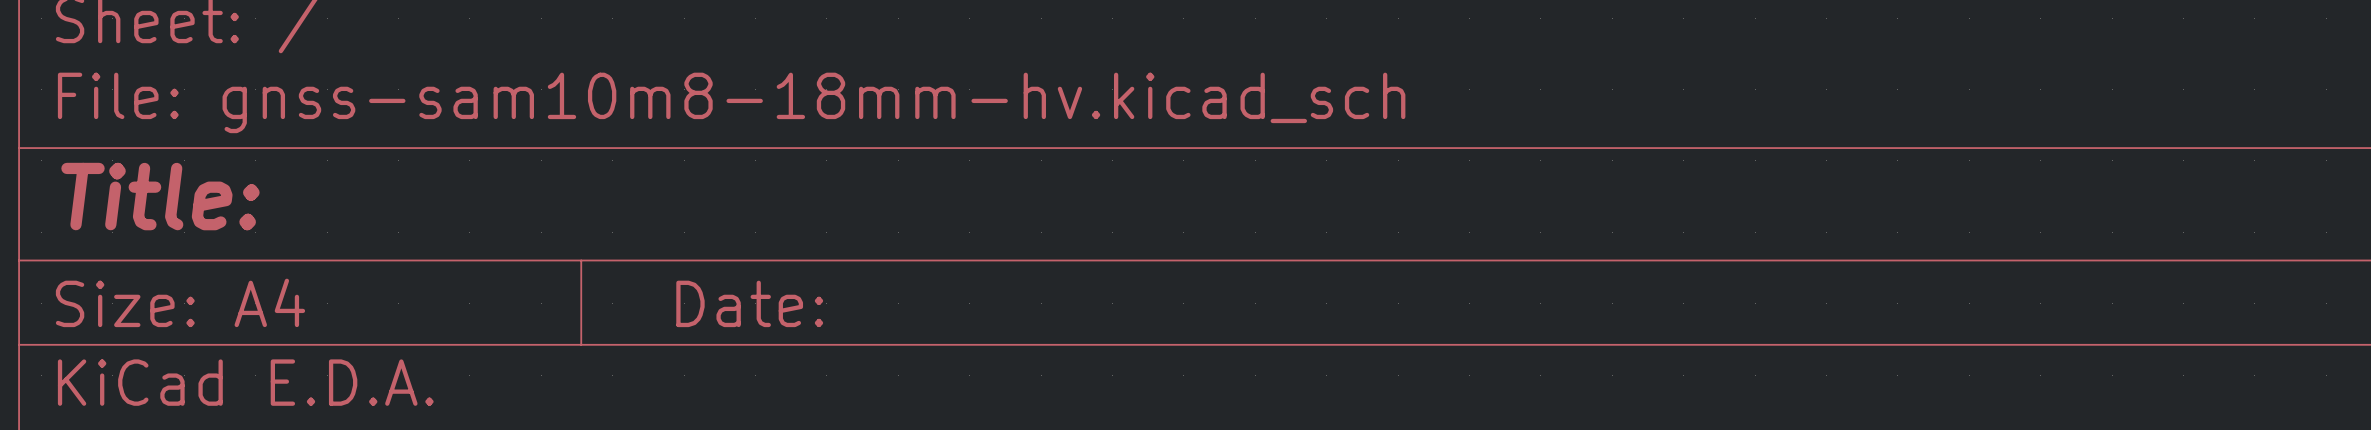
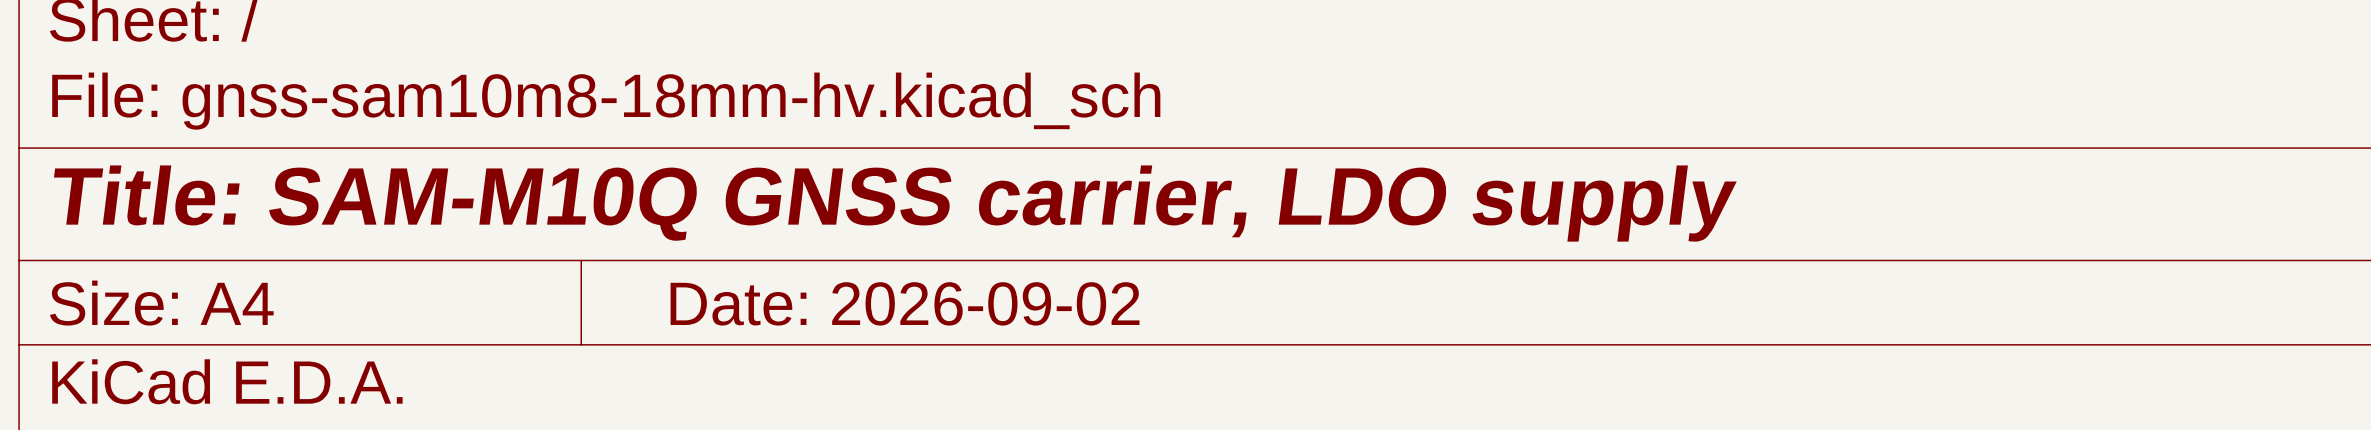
title block: Title: (160, 196) -> Title: SAM-M10Q GNSS carrier, LDO supply (895, 203)
title block: Date: (749, 303) -> Date: 2026-09-02 (905, 303)

